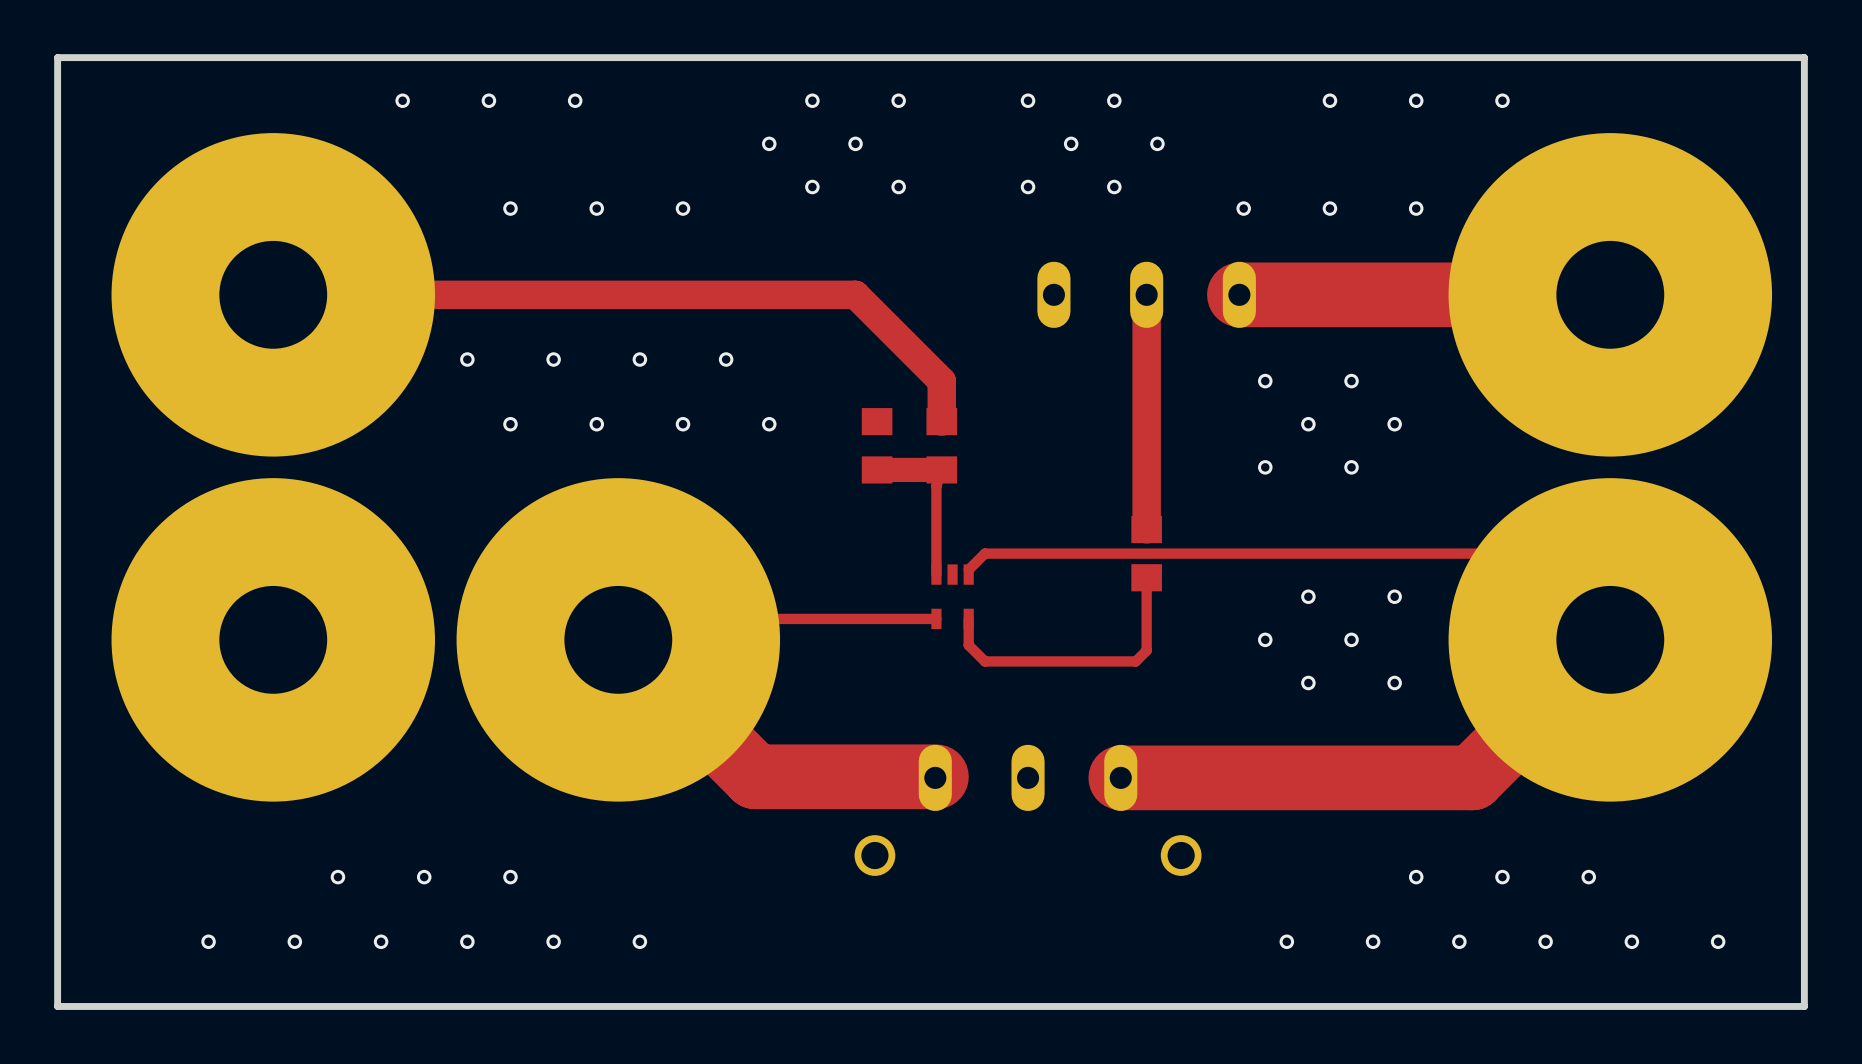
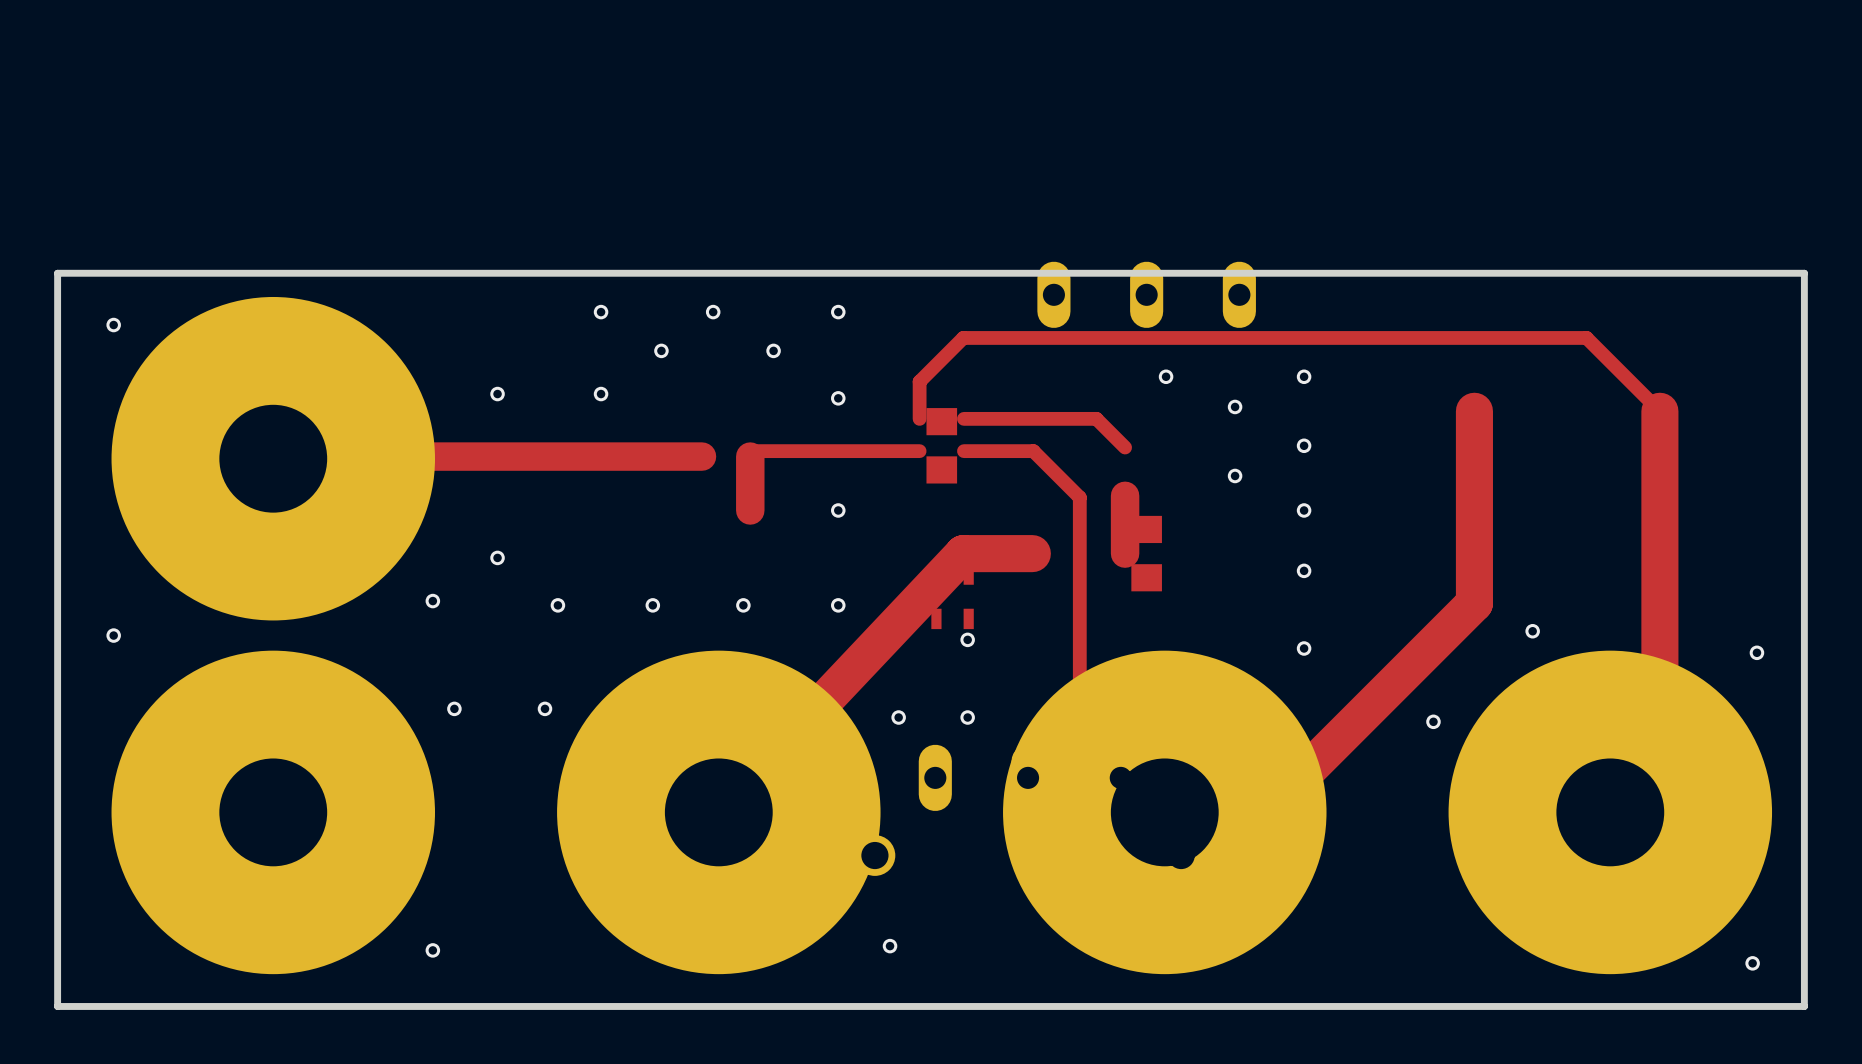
via: (402, 100) -> none
via: (488, 100) -> none
via: (575, 100) -> none
via: (812, 100) -> none
via: (898, 100) -> none
via: (1028, 100) -> none
via: (1114, 100) -> none
via: (1329, 100) -> none
via: (1416, 100) -> none
via: (1502, 100) -> none
via: (769, 143) -> none
via: (855, 143) -> none
via: (1071, 143) -> none
via: (1157, 143) -> none
via: (812, 187) -> none
via: (898, 187) -> none
via: (1028, 187) -> none
via: (1114, 187) -> none
via: (510, 208) -> none
via: (596, 208) -> none
via: (683, 208) -> none
via: (1243, 208) -> none
via: (1329, 208) -> none
via: (1416, 208) -> none
board edge: (1804, 273) (1804, 57) (57, 57) (57, 273) -> (1804, 273) (57, 273)
top track: (273, 294) (855, 294) (941, 381) (941, 421) -> none
part: (273, 294) -> none
top track: (1146, 294) (1146, 529) -> none
top track: (1610, 294) (1239, 294) -> none
part: (1610, 294) -> none
via: none -> (601, 312)
via: none -> (713, 312)
via: none -> (838, 312)
via: none -> (113, 325)
via: none -> (773, 350)
via: (467, 359) -> none
via: (553, 359) -> none
via position: (639, 359) -> (661, 350)
via: (726, 359) -> none
via: none -> (1166, 376)
via: none -> (1304, 376)
via: (1265, 381) -> none
via: (1351, 381) -> none
via: none -> (497, 394)
via: none -> (601, 394)
via: none -> (838, 398)
via: none -> (1235, 406)
top track: none -> (1474, 411) (1474, 603) (1265, 812) (1164, 812) (1079, 734) (1079, 497) (1033, 451) (963, 451)
top track: none -> (919, 418) (919, 381) (963, 337) (1586, 337) (1659, 411) (1659, 762) (1610, 812)
top track: none -> (963, 418) (1096, 418) (1125, 447)
via: (510, 424) -> none
via: (596, 424) -> none
via: (683, 424) -> none
via: (769, 424) -> none
via position: (1308, 424) -> (1304, 445)
via: (1394, 424) -> none
part: (877, 445) -> none
top track: none -> (919, 451) (755, 451) (750, 456) (750, 510)
top track: none -> (701, 456) (275, 456) (273, 458)
part: none -> (273, 458)
via: (1265, 467) -> none
via: (1351, 467) -> none
top track: (877, 469) (941, 469) (936, 486) (936, 574) -> none
via: none -> (1235, 475)
top track: none -> (1125, 495) (1125, 553)
via: none -> (838, 510)
via: none -> (1304, 510)
top track: (984, 553) (968, 569) -> (984, 553) (963, 553) (718, 812)
top track: (1032, 553) (1524, 553) (1610, 639) (1472, 777) (1120, 777) -> none
top track width: thin (1032, 553) (984, 553) -> thick (1032, 553) (984, 553)
via: none -> (497, 557)
via: none -> (1304, 570)
top track: (1146, 577) (1146, 650) (1135, 661) (984, 661) (968, 645) (968, 618) -> none
via: (1308, 596) -> none
via: (1394, 596) -> none
via: none -> (432, 601)
via: none -> (557, 605)
via: none -> (652, 605)
via: none -> (743, 605)
via: none -> (838, 605)
top track: (936, 618) (639, 618) (618, 639) (755, 776) (936, 776) (935, 777) -> none
via: none -> (1532, 631)
via: none -> (113, 635)
part: (273, 639) -> none
part: (618, 639) -> none
via: none -> (967, 639)
via: (1265, 639) -> none
via: (1351, 639) -> none
part position: (1610, 639) -> (1610, 812)
via: none -> (1304, 648)
via: none -> (1756, 652)
via: (1308, 683) -> none
via: (1394, 683) -> none
via: none -> (454, 708)
via: none -> (544, 708)
via: none -> (898, 717)
via: none -> (967, 717)
via: none -> (1433, 721)
part: none -> (273, 812)
part: none -> (718, 812)
part: none -> (1164, 812)
via: (337, 877) -> none
via: (424, 877) -> none
via: (510, 877) -> none
via: (1416, 877) -> none
via: (1502, 877) -> none
via: (1588, 877) -> none
via: (208, 941) -> none
via: (294, 941) -> none
via: (381, 941) -> none
via: (467, 941) -> none
via: (553, 941) -> none
via: (639, 941) -> none
via: (1286, 941) -> none
via: (1373, 941) -> none
via: (1459, 941) -> none
via: (1545, 941) -> none
via: (1631, 941) -> none
via position: (1718, 941) -> (1752, 963)
via: none -> (890, 946)
via: none -> (432, 950)

